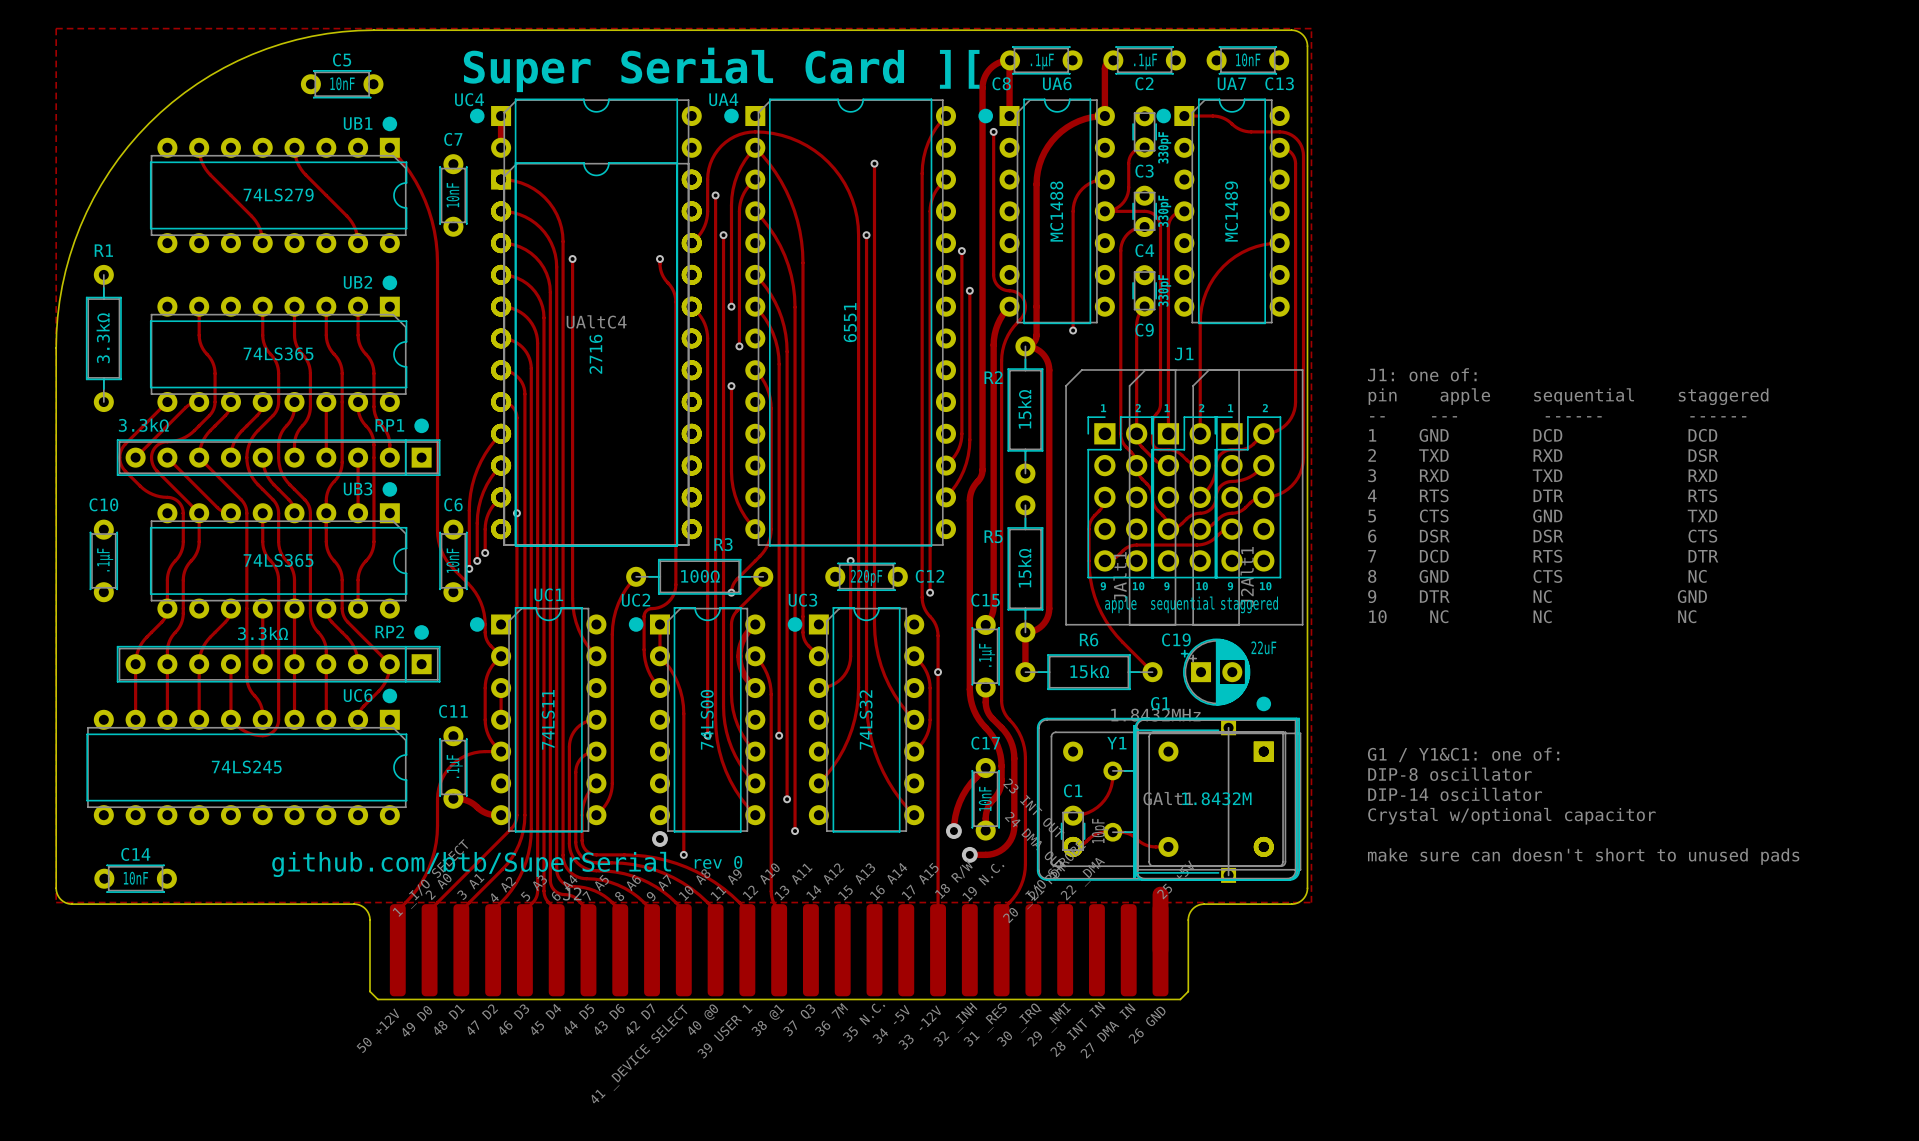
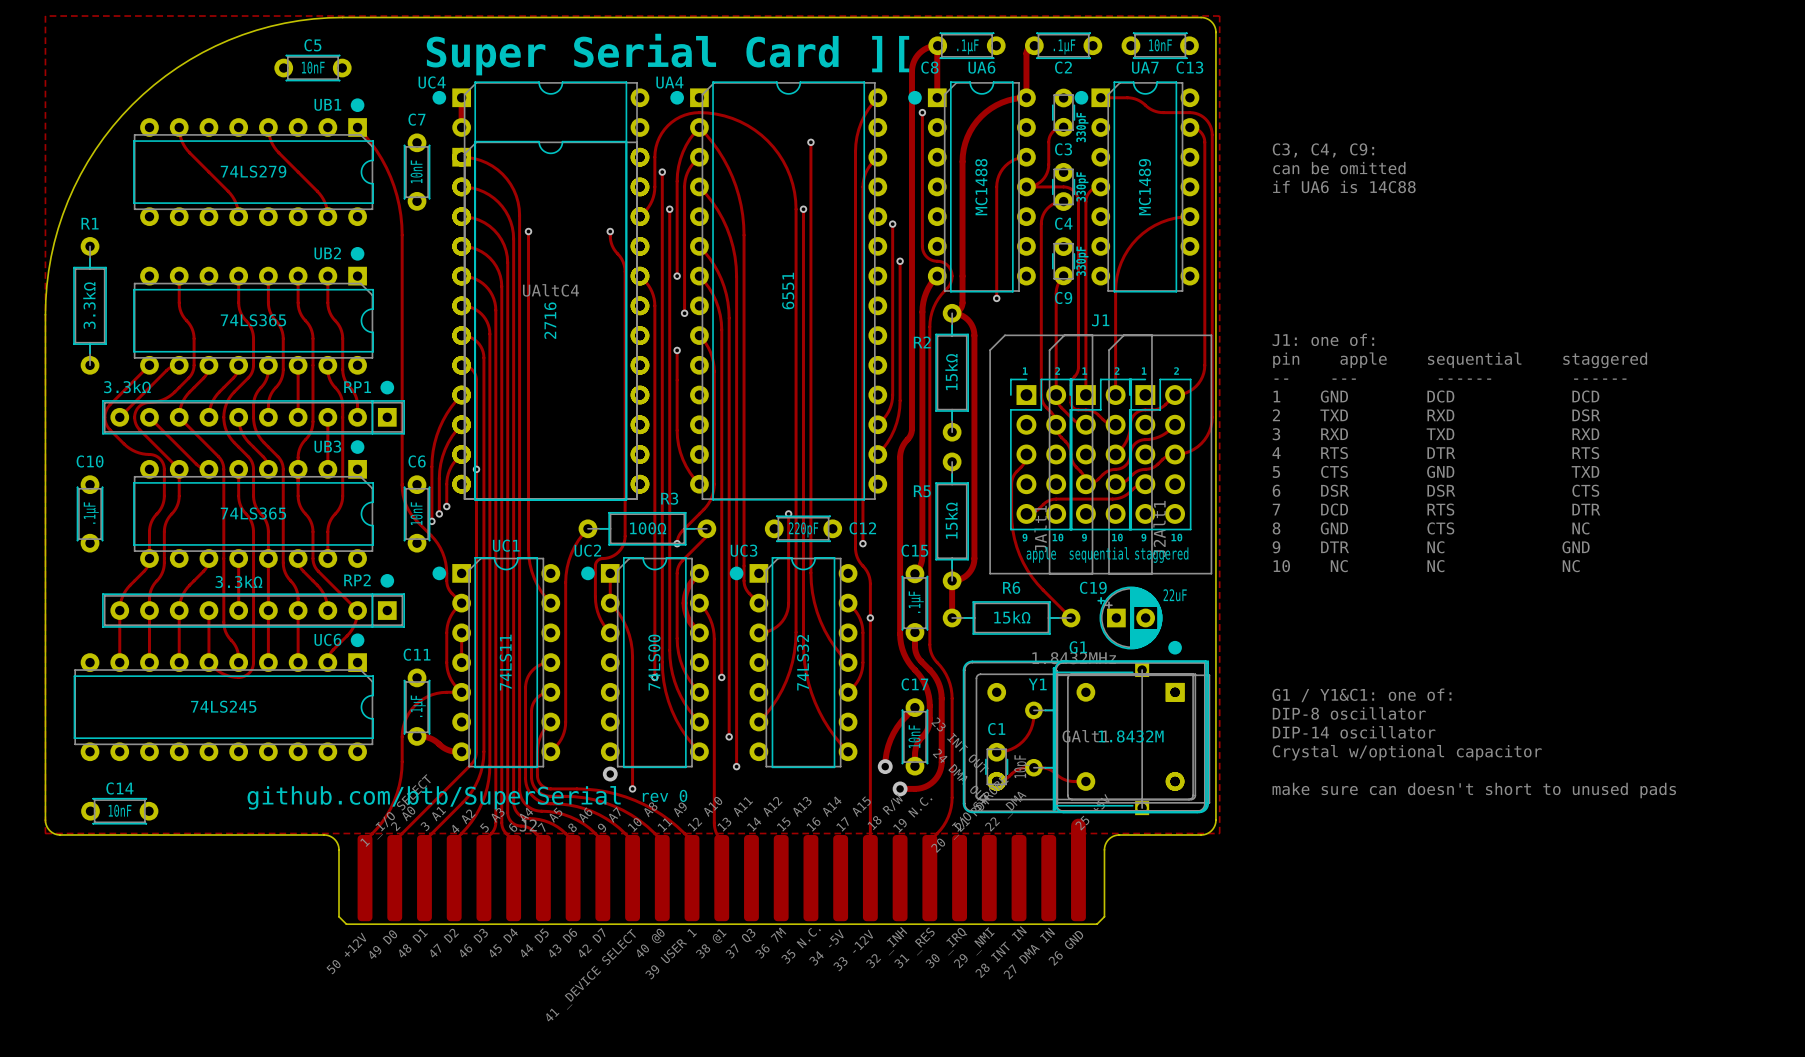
text: none -> C3, C4, C9: (1323, 150)
text: none -> can be omitted (1339, 168)
text: none -> if UA6 is 14C88 (1344, 186)

